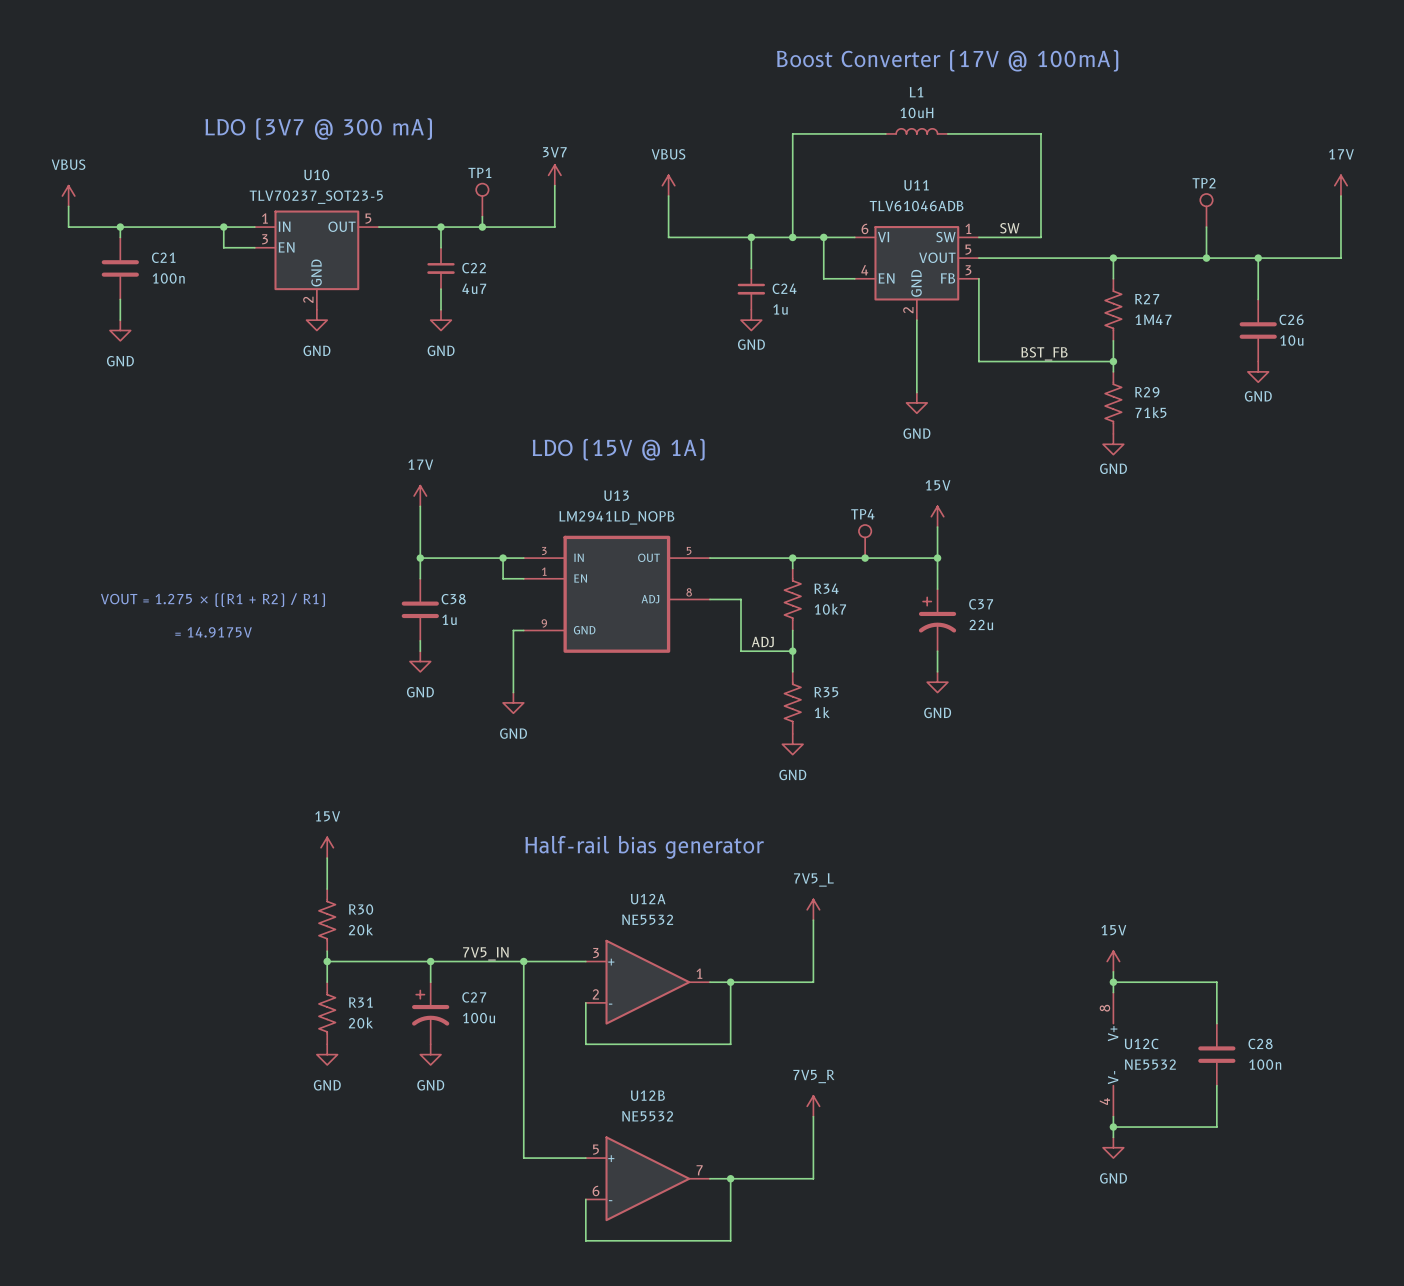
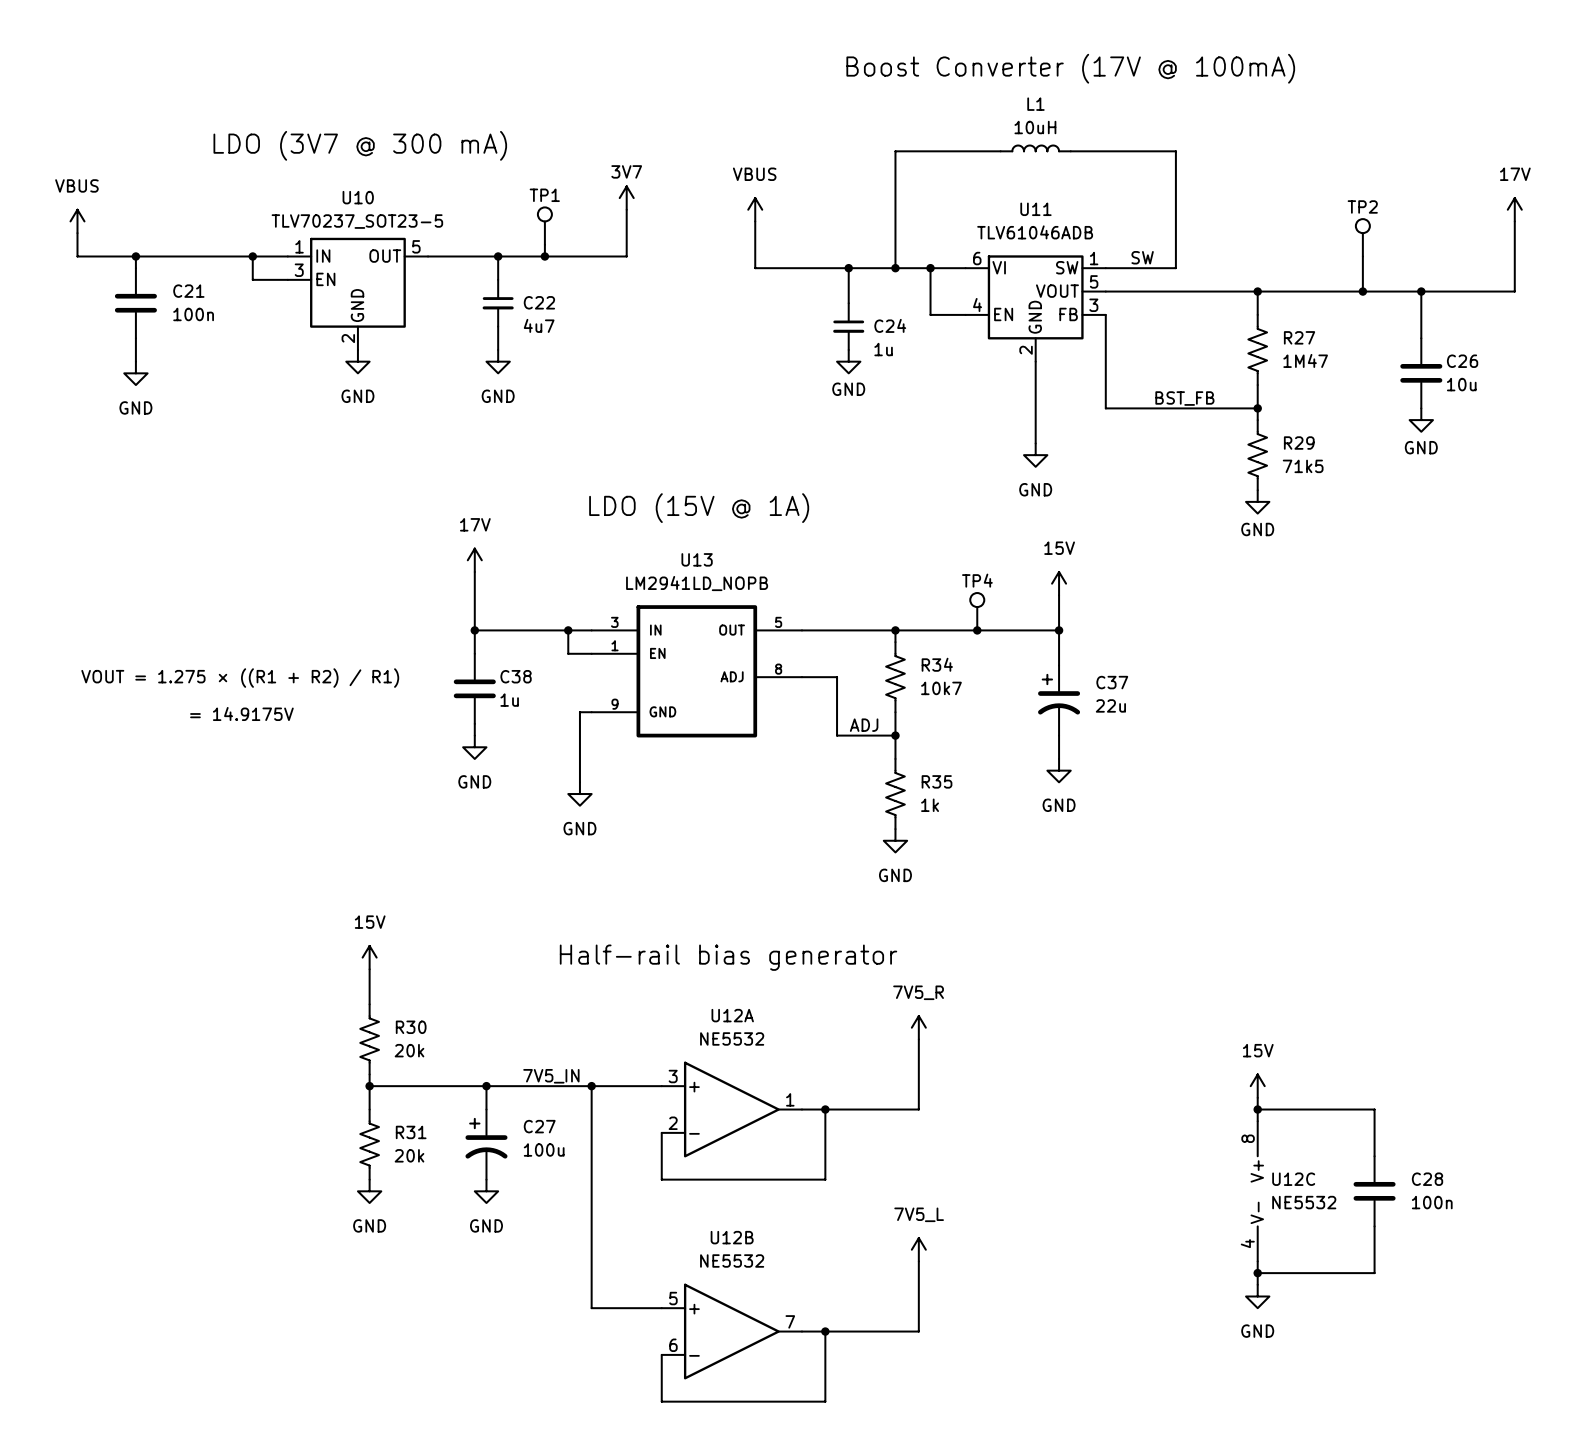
power symbol: 7V5_L (813, 909) -> 7V5_R (918, 1027)
power symbol: 7V5_R (813, 1106) -> 7V5_L (918, 1249)

